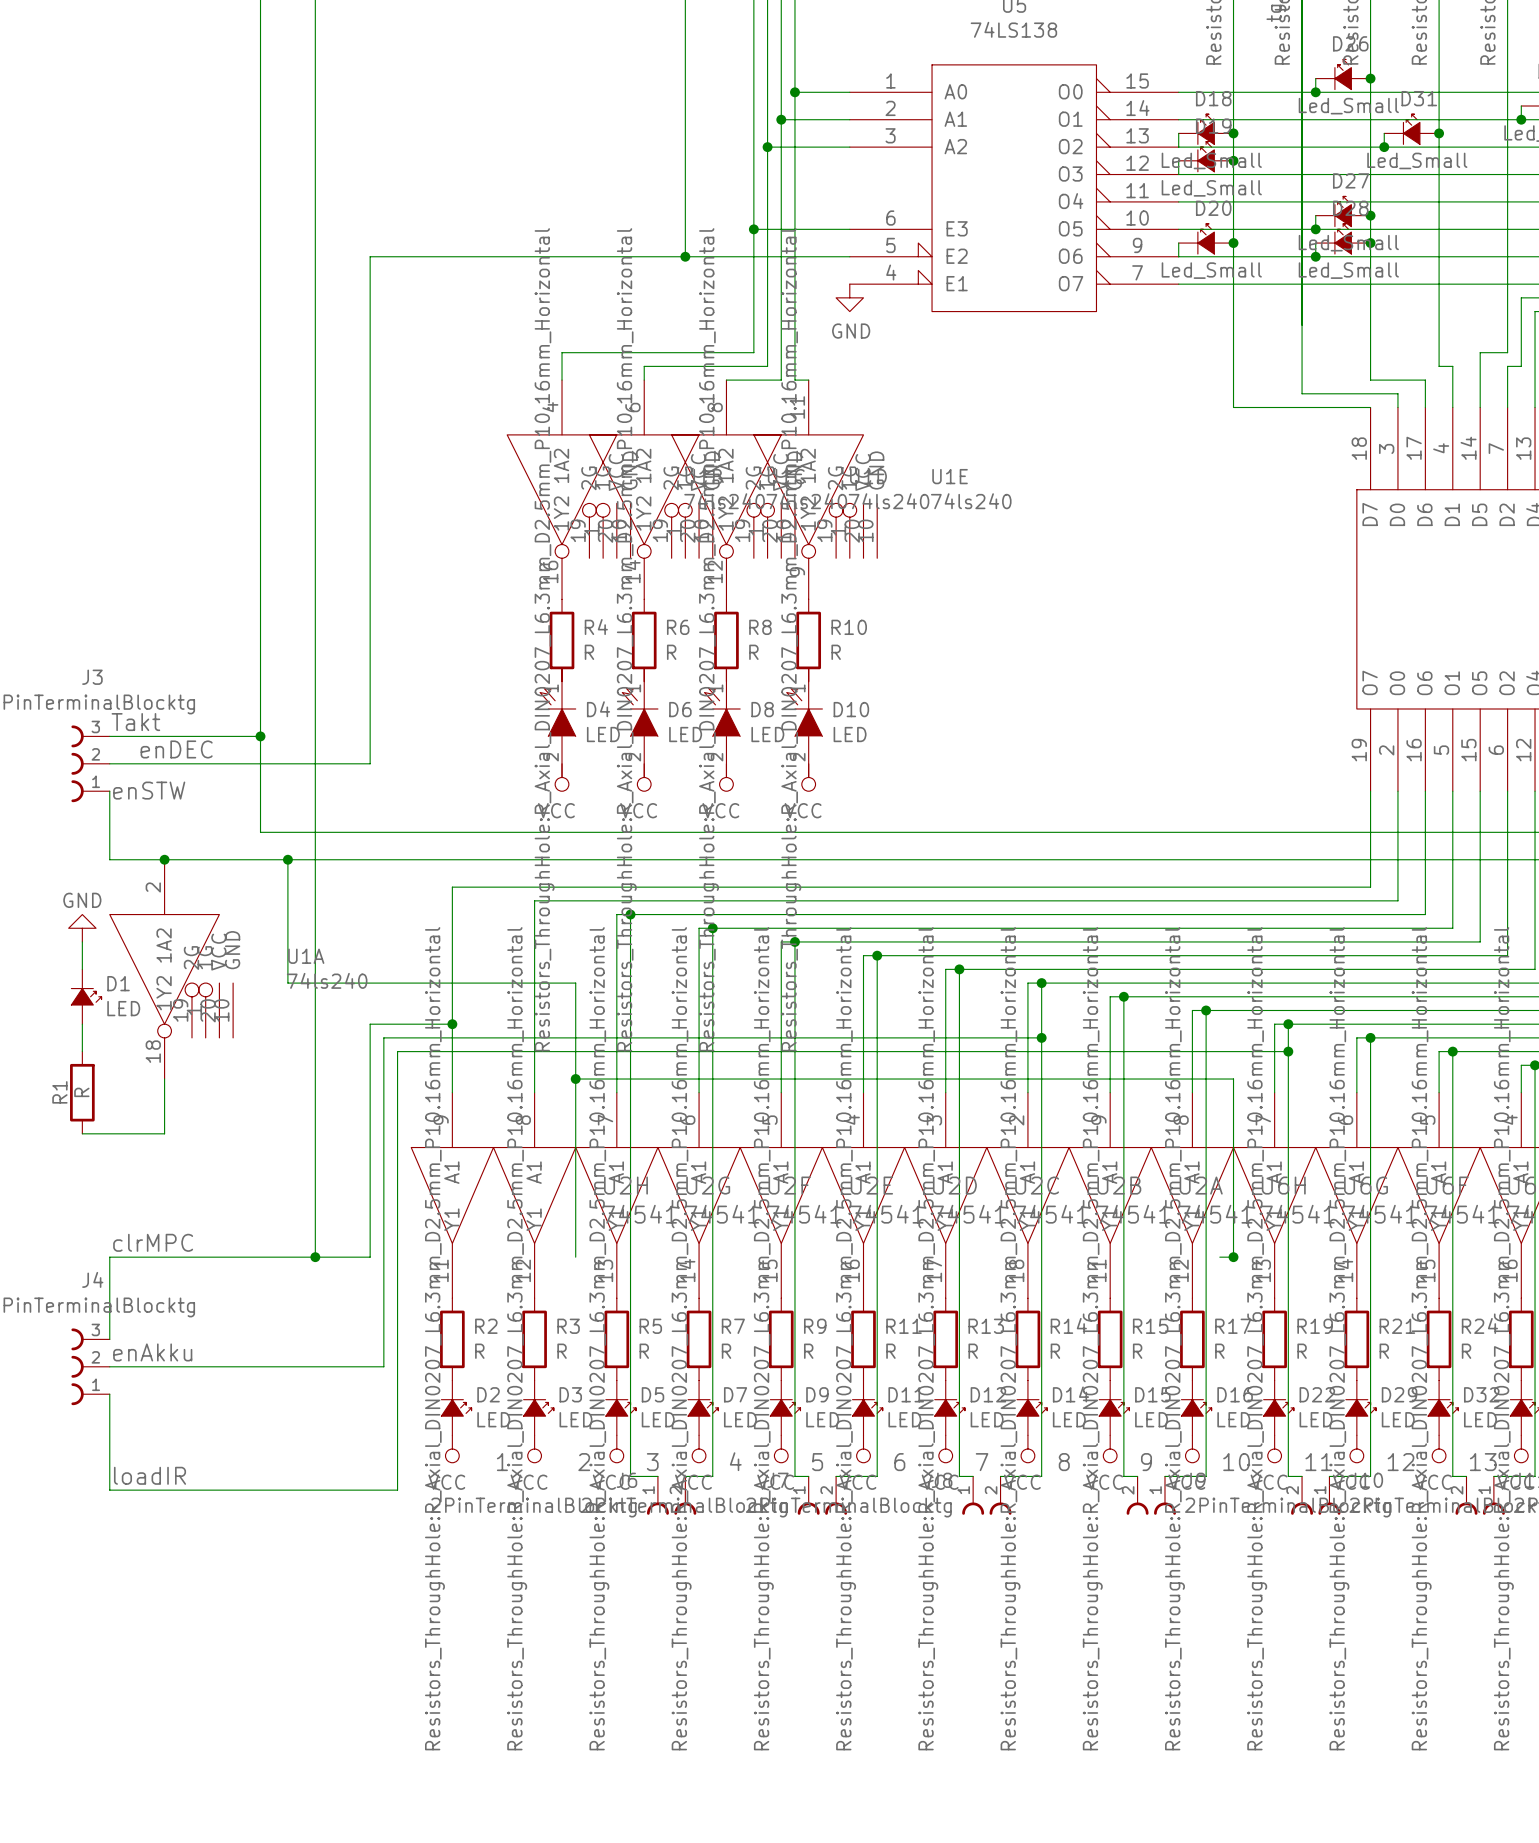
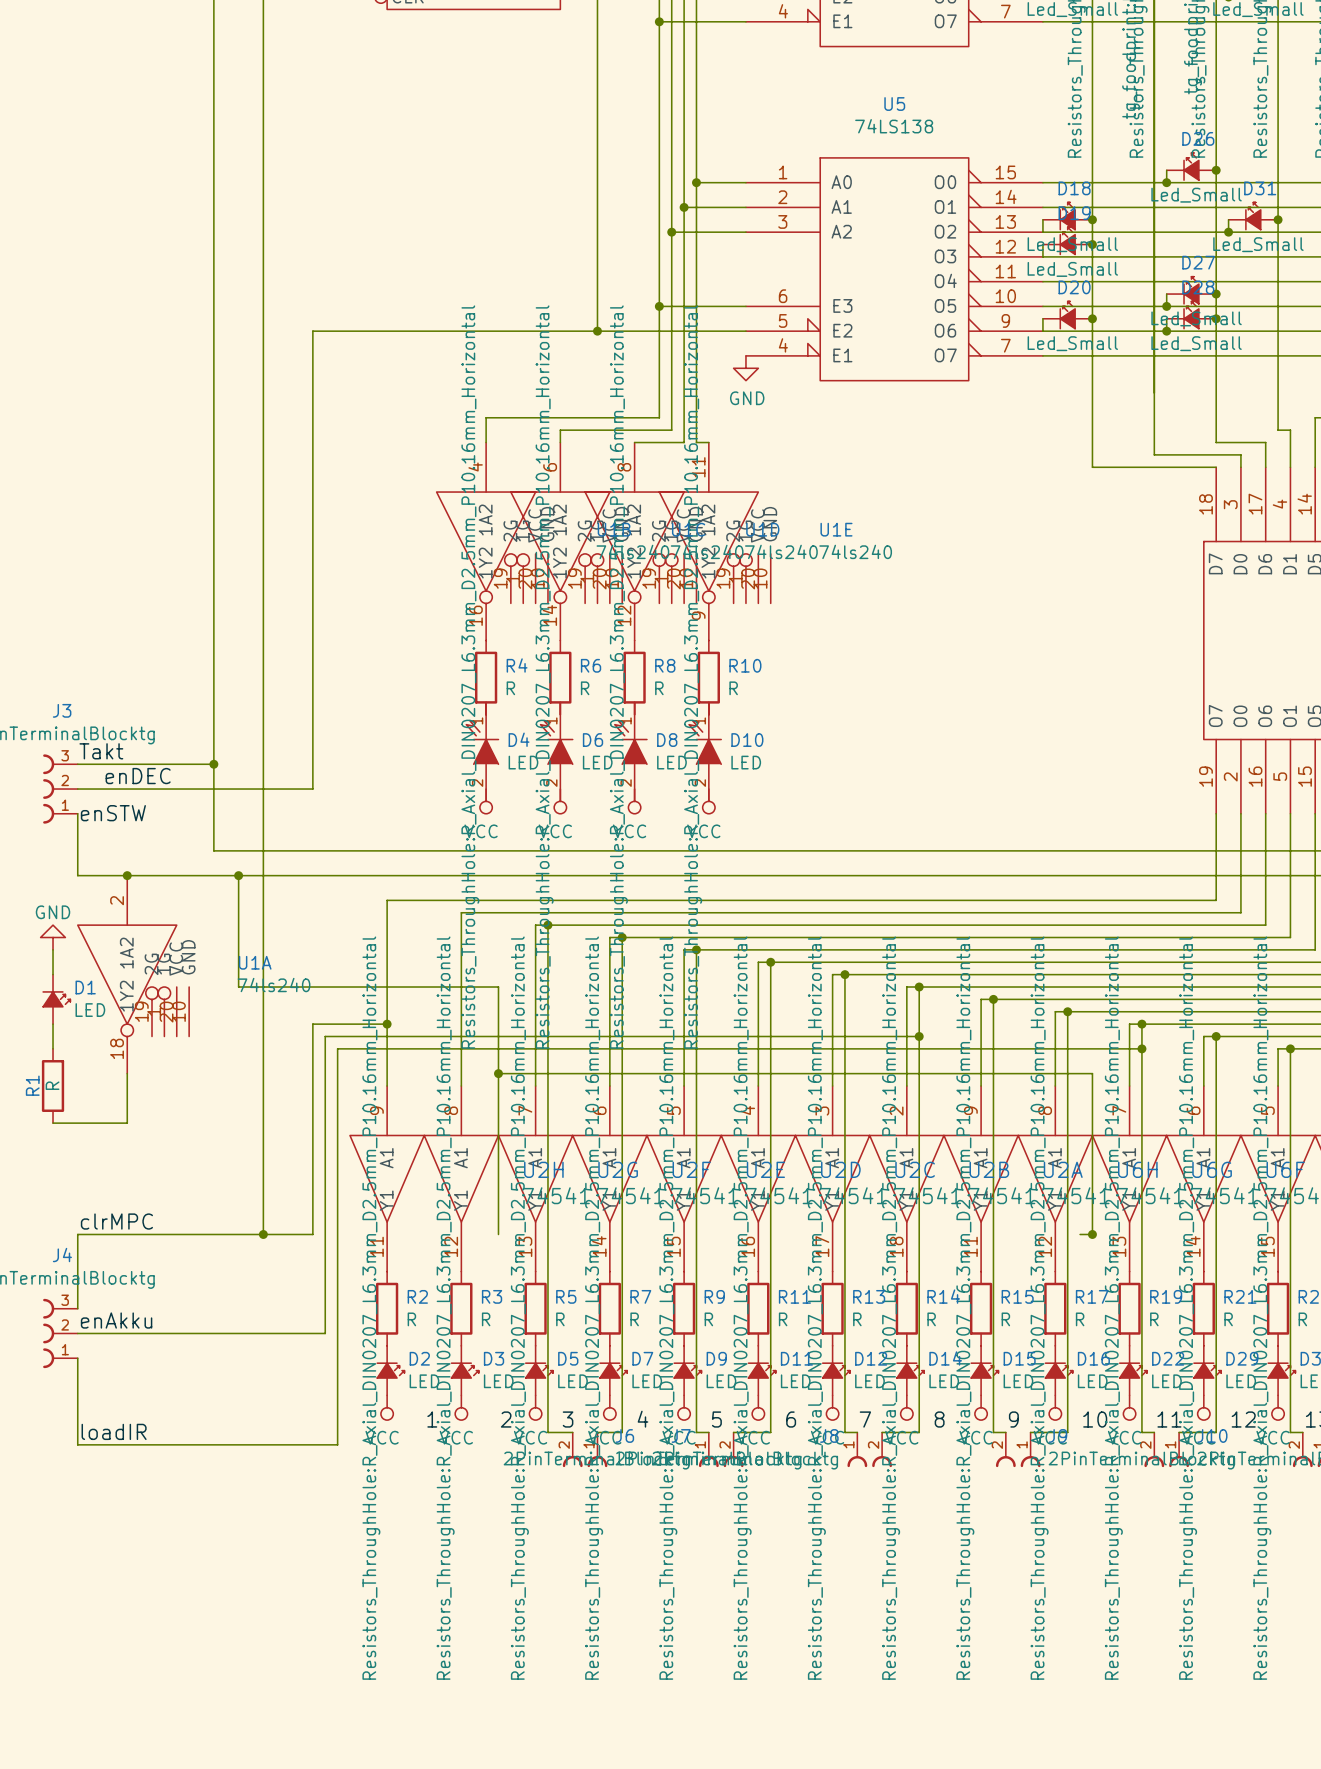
J6 flip: as is (671, 1508) -> left-right (585, 1461)

